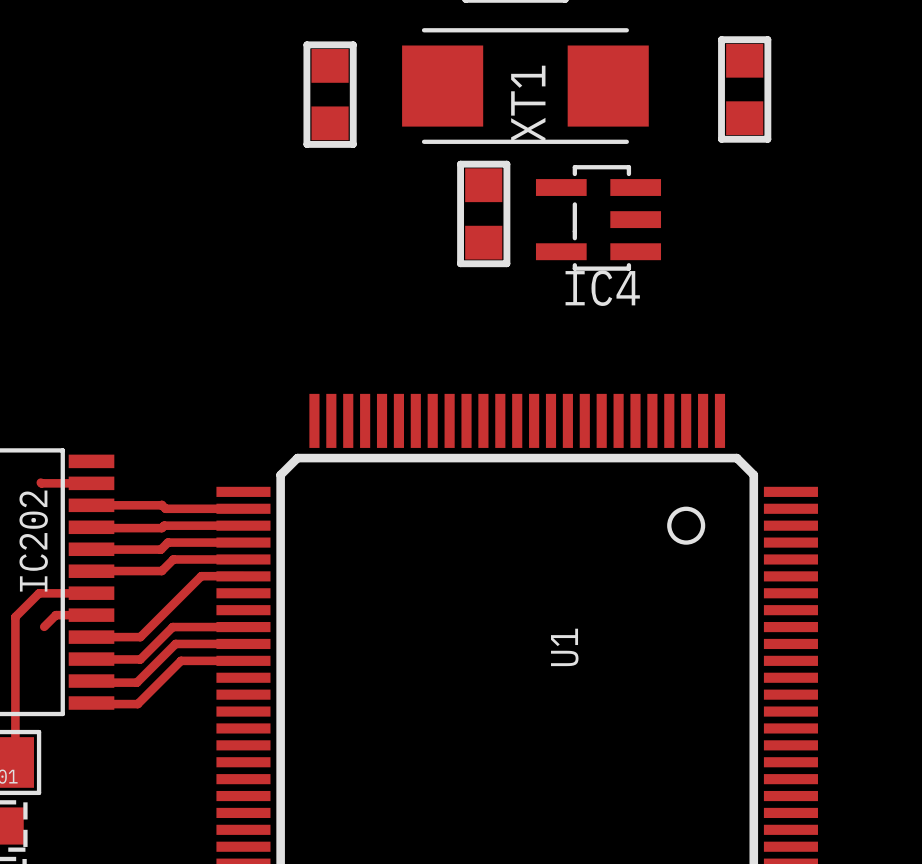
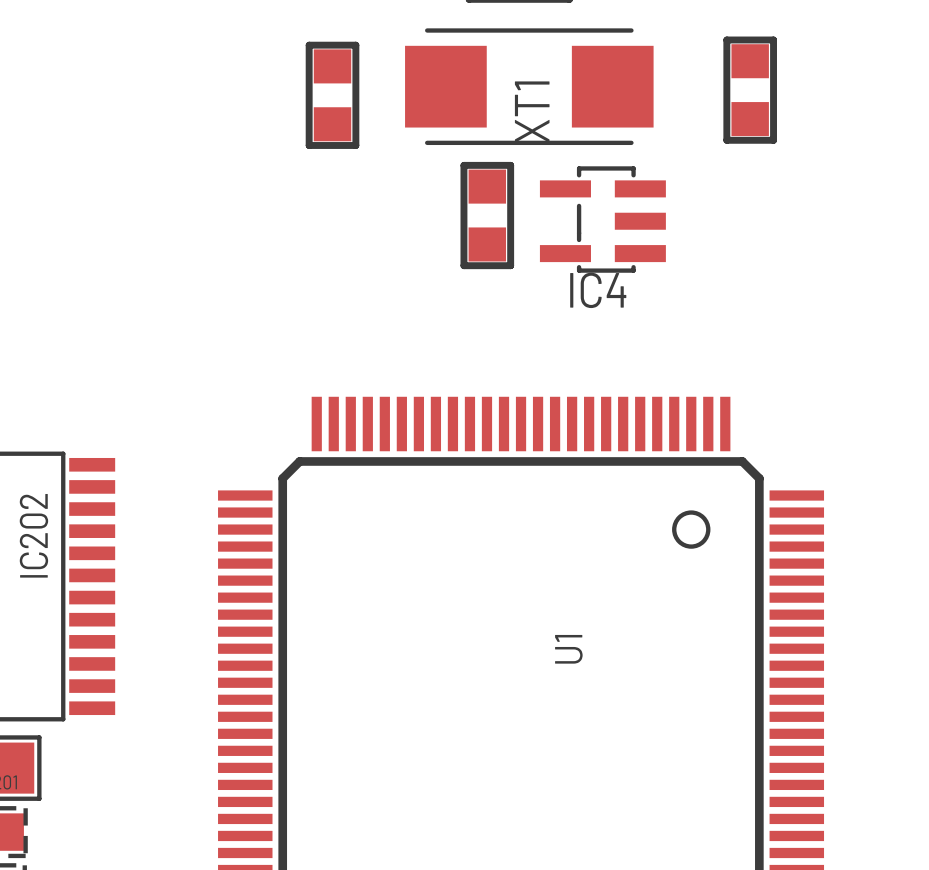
track: (40, 482) (91, 483) -> none
track: (91, 505) (161, 504) (165, 508) (243, 508) -> none
track: (243, 525) (164, 525) (161, 528) (91, 527) -> none
track: (243, 542) (167, 542) (160, 549) (91, 549) -> none
track: (243, 559) (173, 559) (161, 571) (91, 571) -> none
track: (243, 576) (201, 576) (140, 637) (91, 637) -> none
track: (91, 593) (39, 593) (15, 617) (15, 762) -> none
track: (91, 615) (55, 615) (44, 626) -> none
track: (243, 627) (172, 627) (140, 659) (91, 659) -> none
track: (243, 643) (175, 643) (136, 682) (93, 682) (91, 681) -> none
track: (243, 660) (181, 660) (137, 704) (91, 703) -> none

